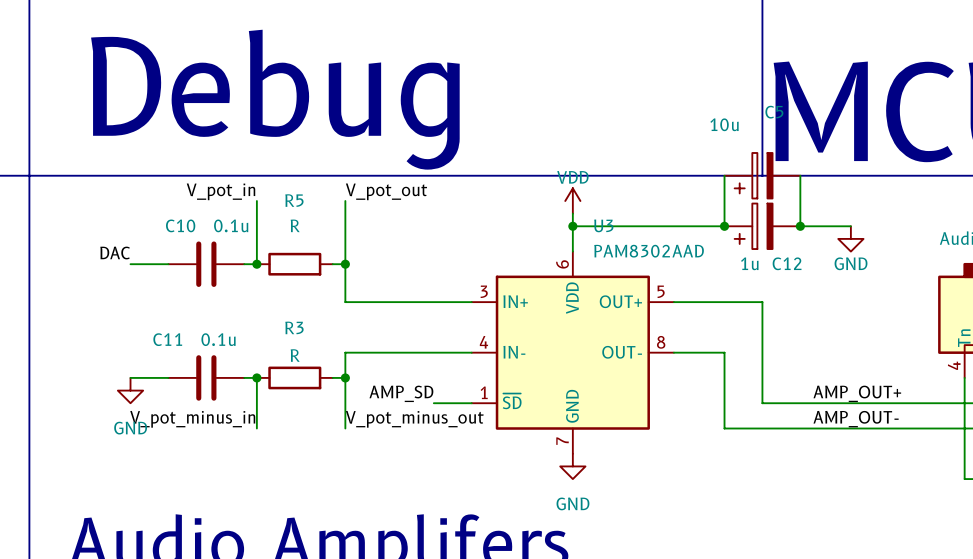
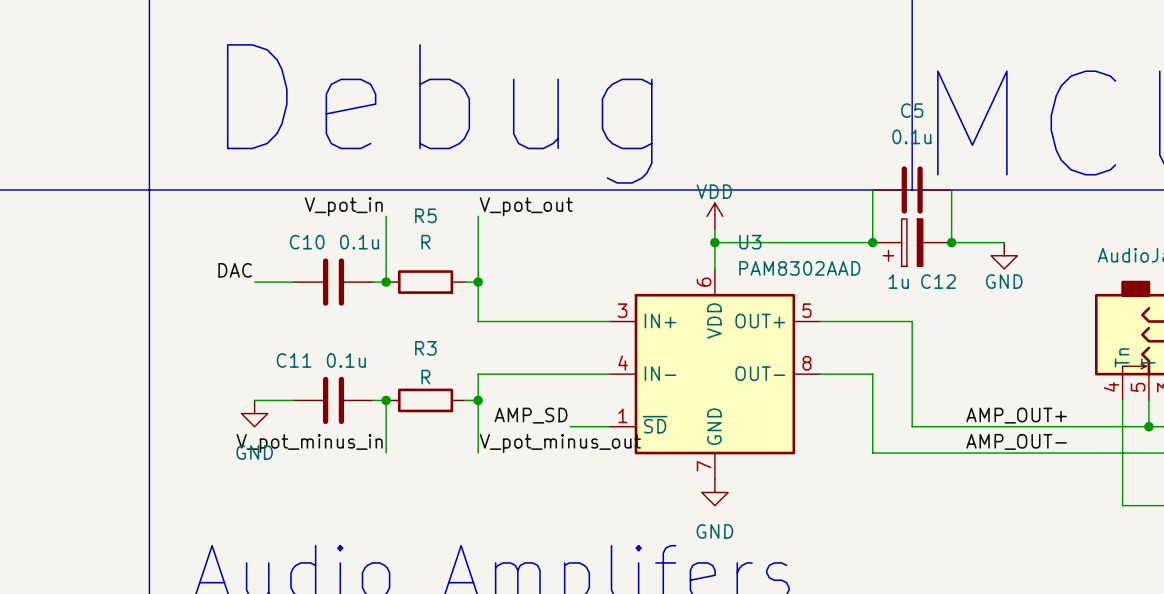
C5 value: 10u (724, 124) -> 0.1u (911, 136)
C5 symbol: [724, 152, 801, 199] -> [872, 166, 952, 214]

